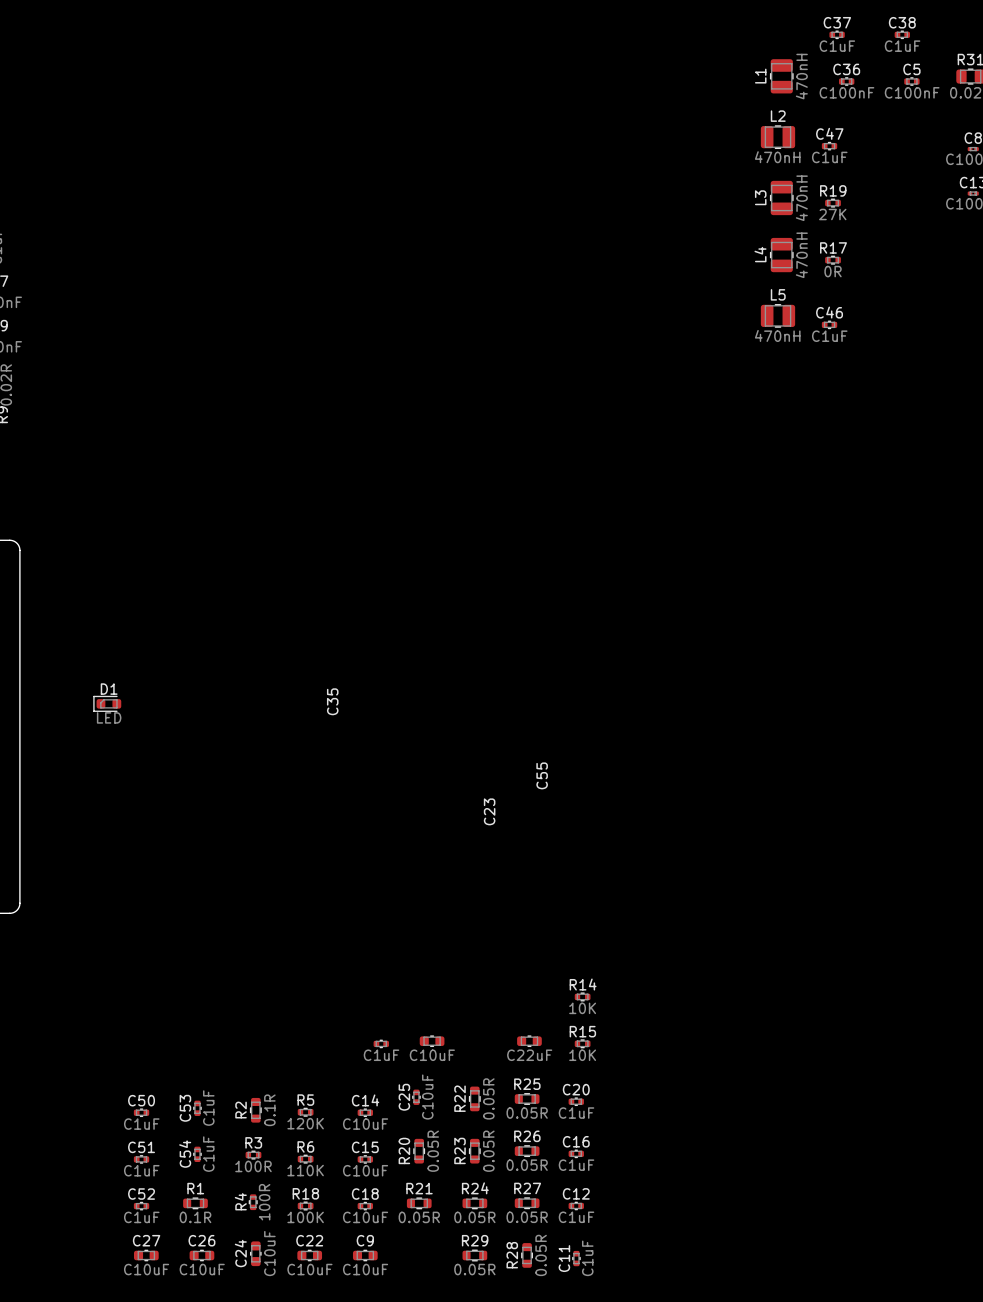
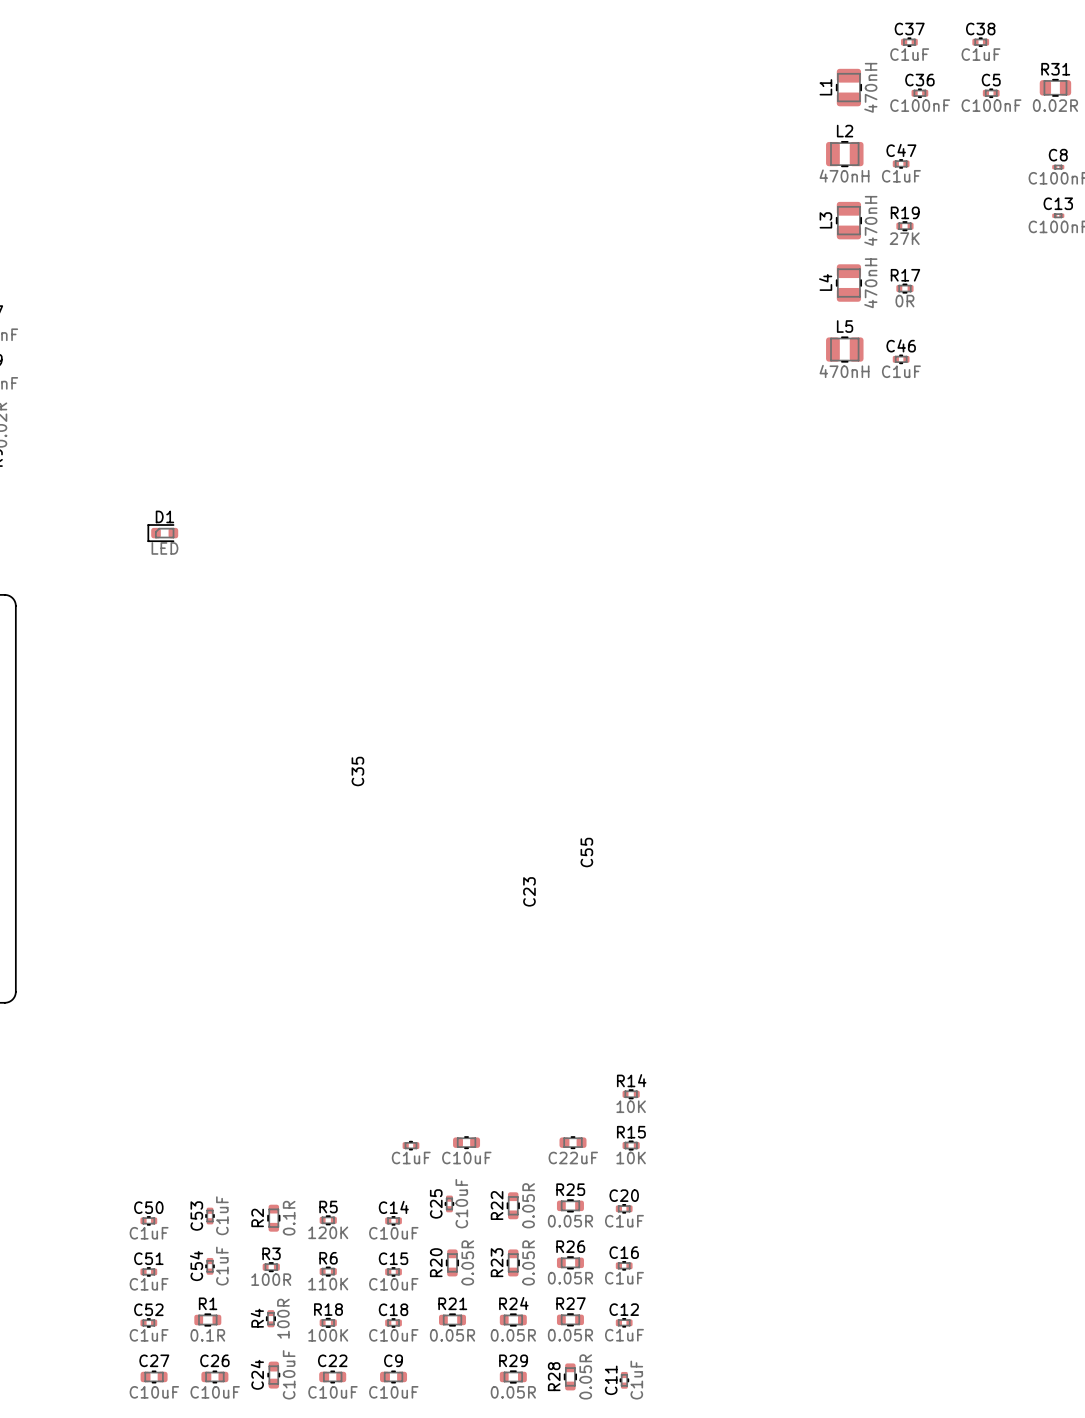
D1 position: (107, 703) -> (162, 533)

